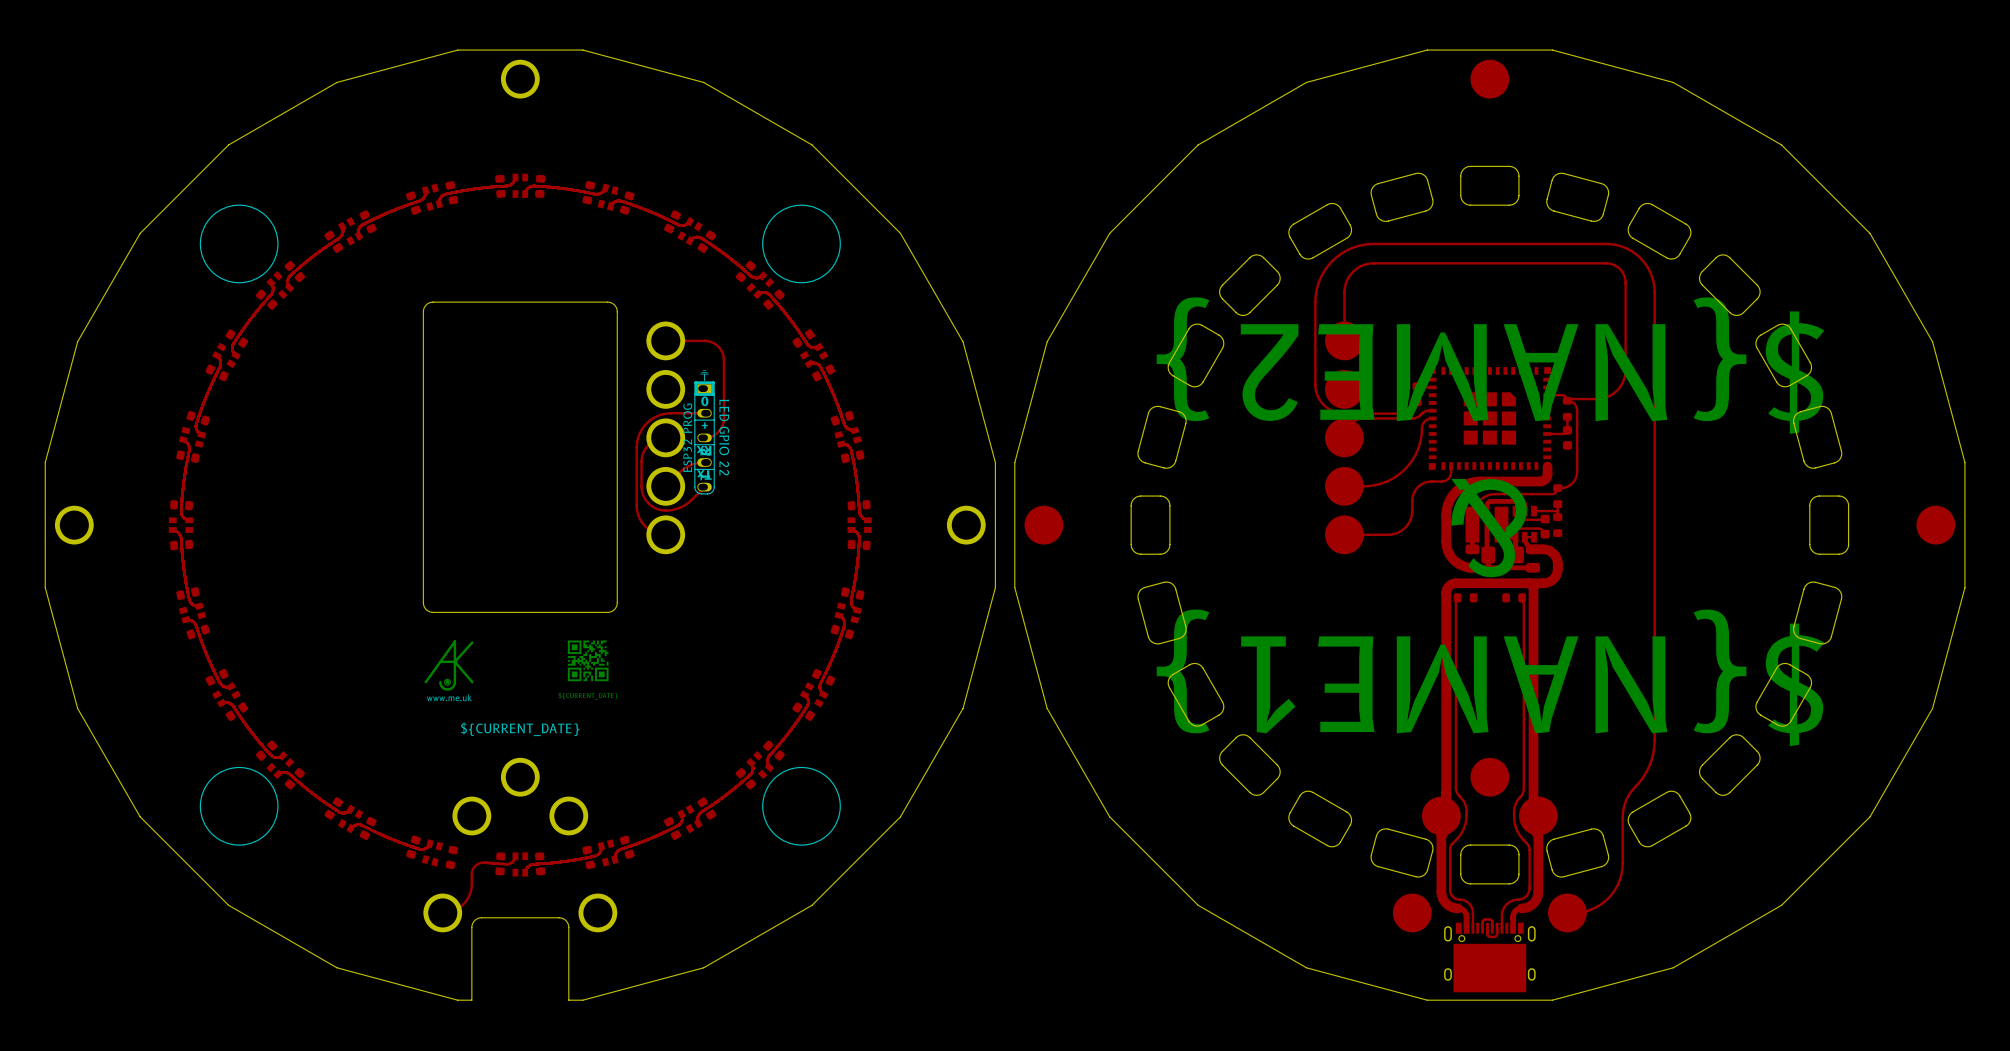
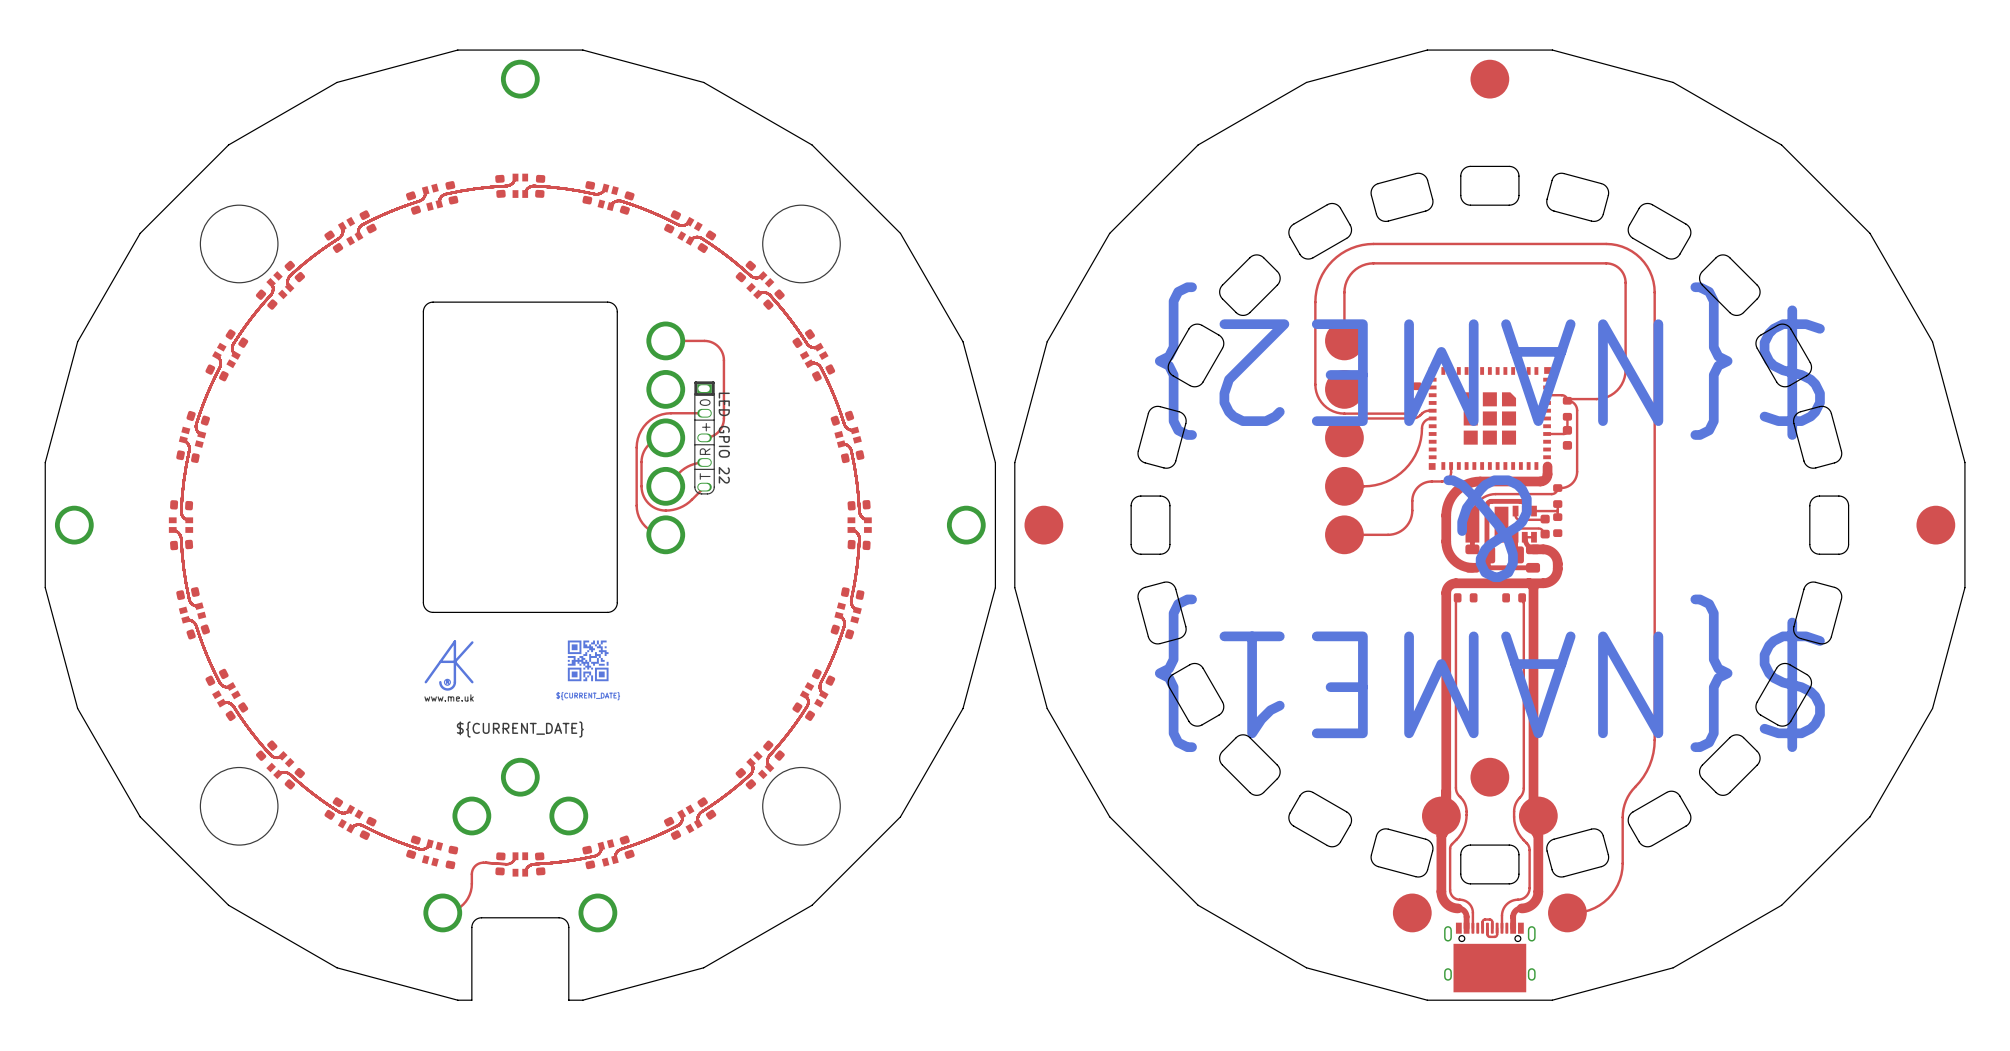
part footprint: [694, 381, 715, 495] -> [694, 381, 715, 495]

